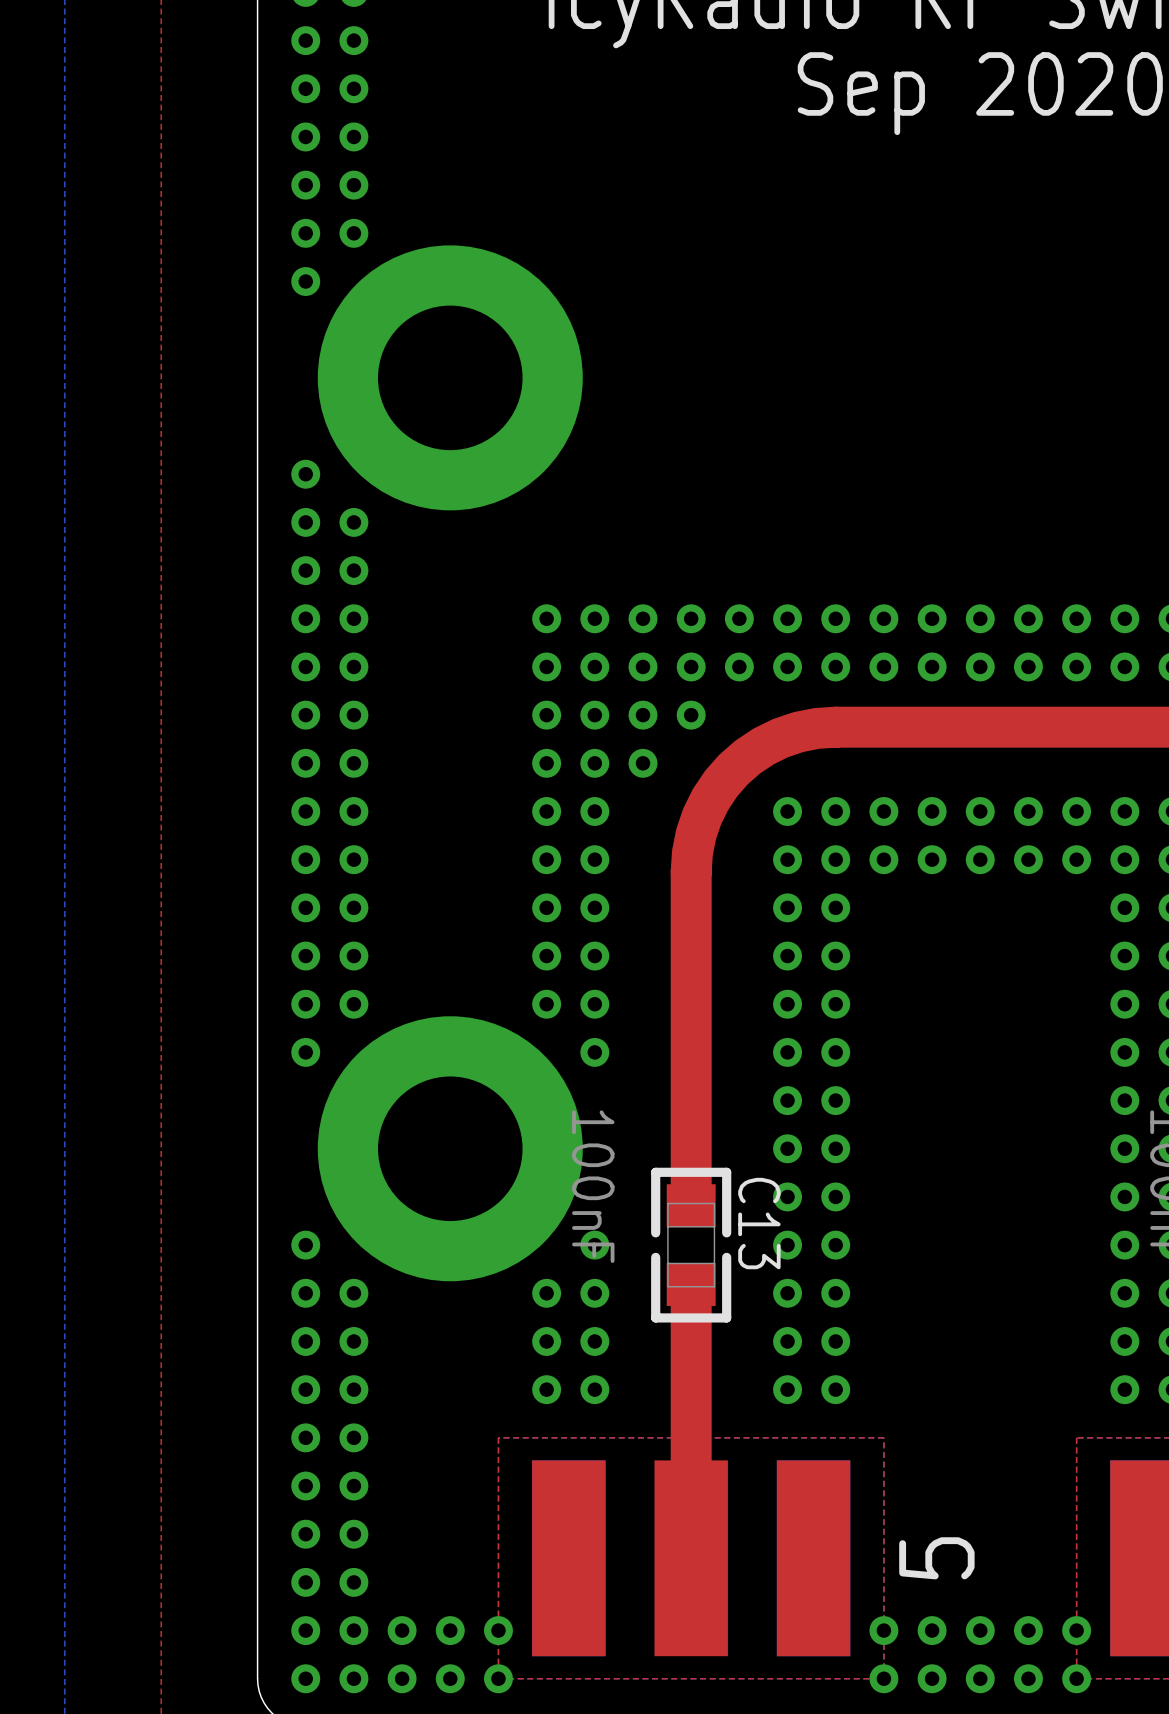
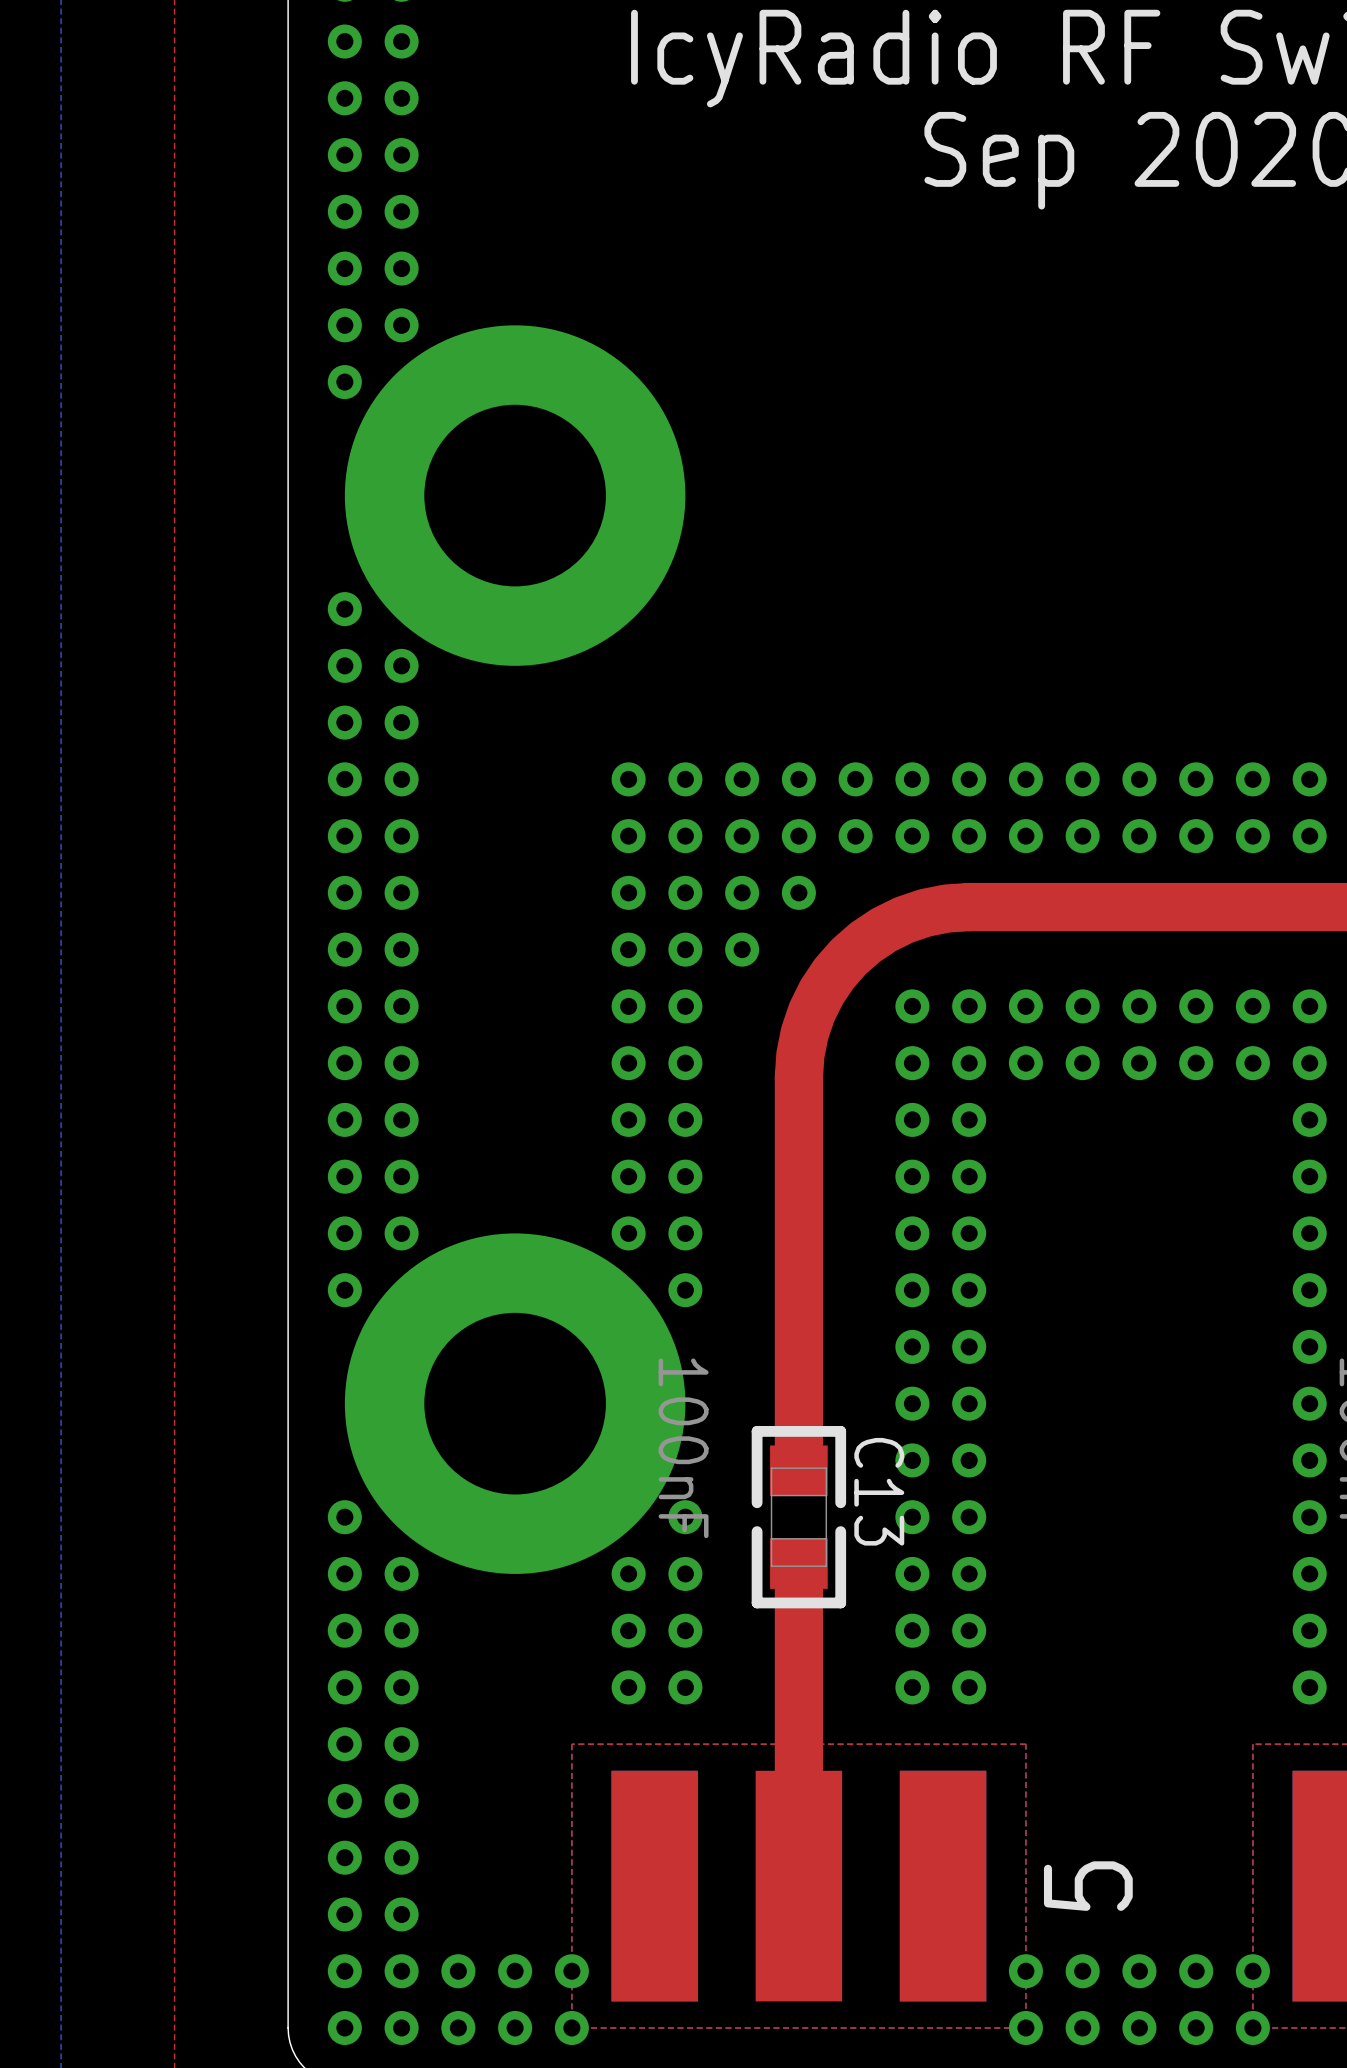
via size: [317, 245, 583, 511] -> [344, 325, 686, 666]
via size: [317, 1016, 583, 1282] -> [344, 1233, 686, 1574]

